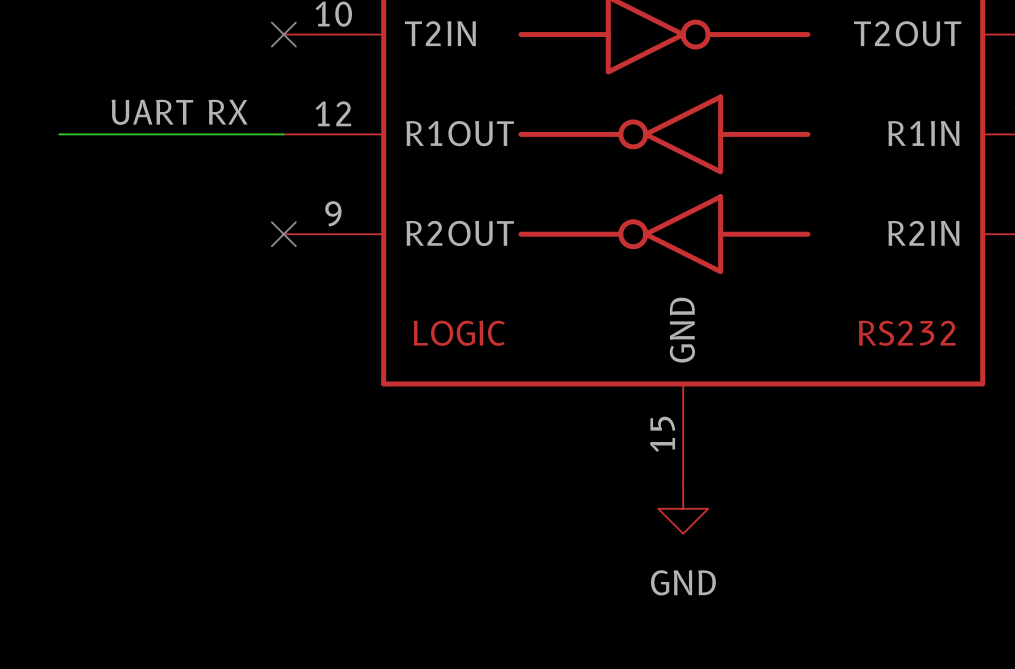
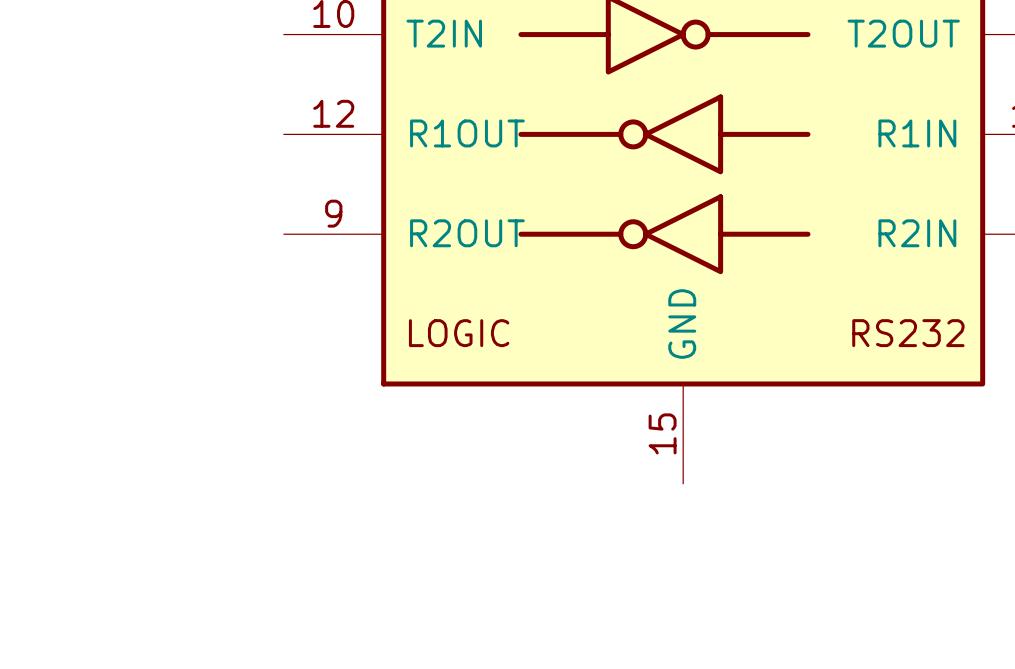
no-connect mark: (283, 34) -> none
label: UART RX (179, 112) -> none
wire: (59, 134) (283, 134) -> none
no-connect mark: (283, 234) -> none
power symbol: GND (683, 508) -> none

